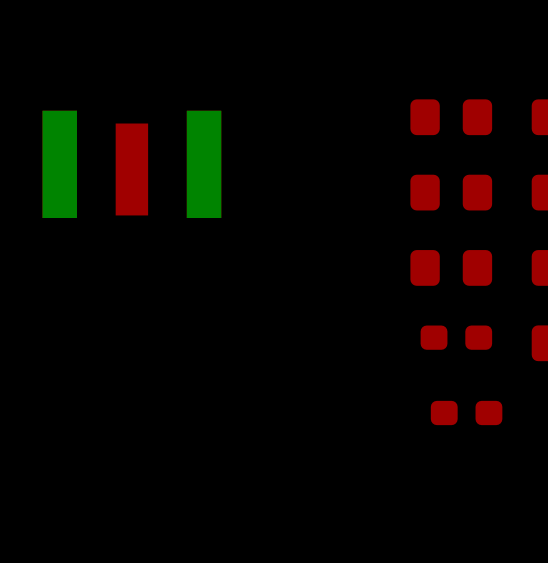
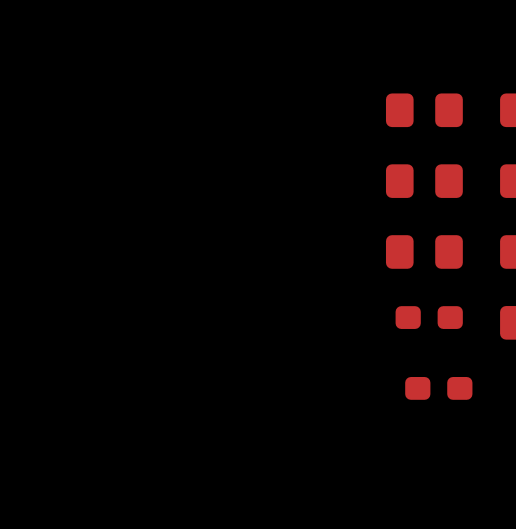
part: (131, 164) -> none

